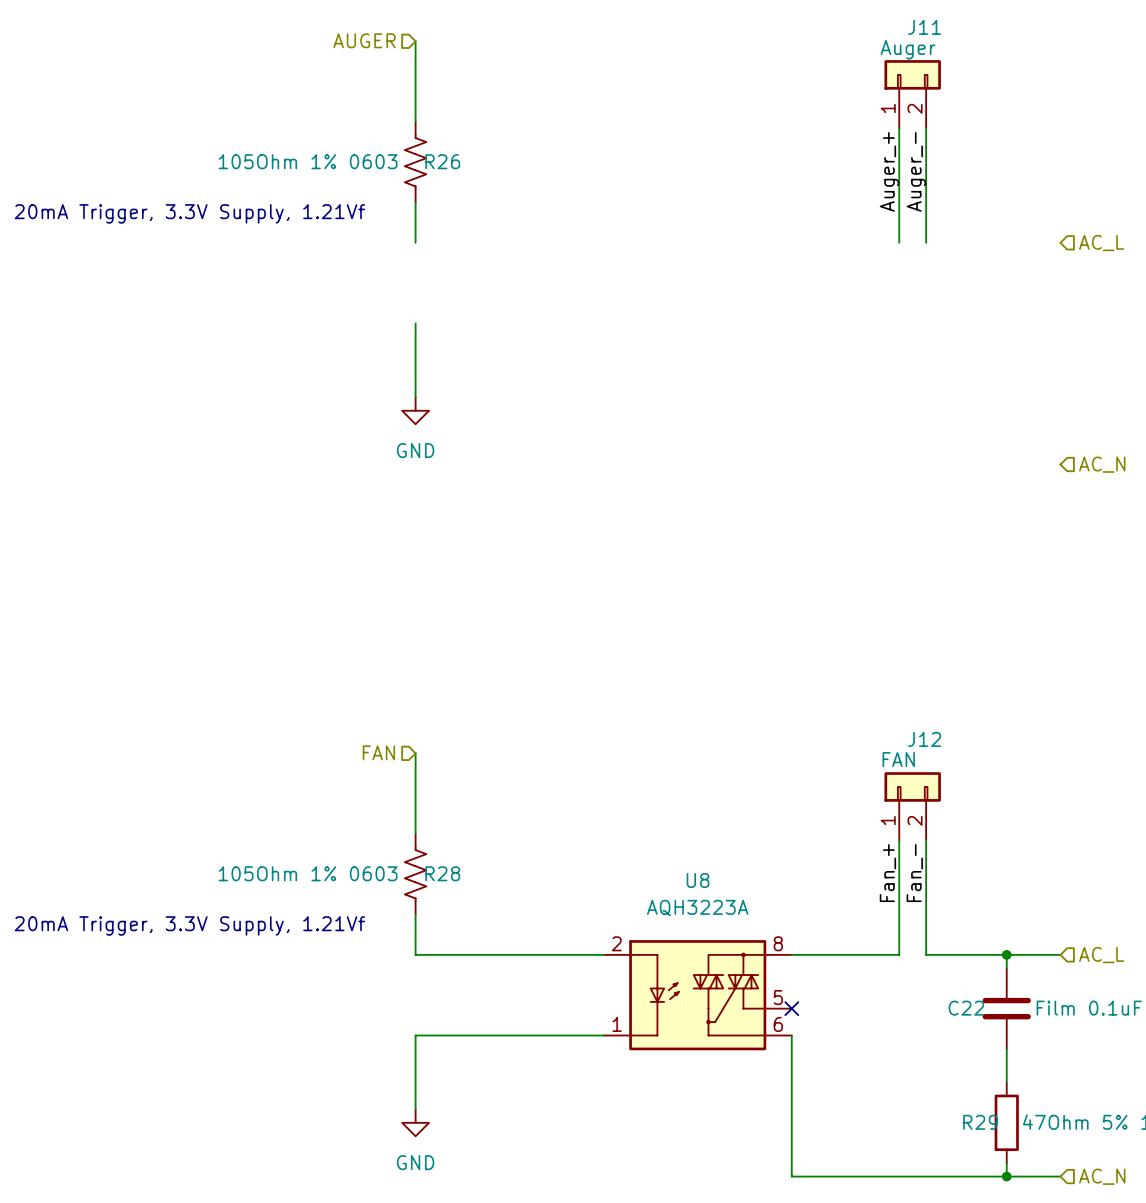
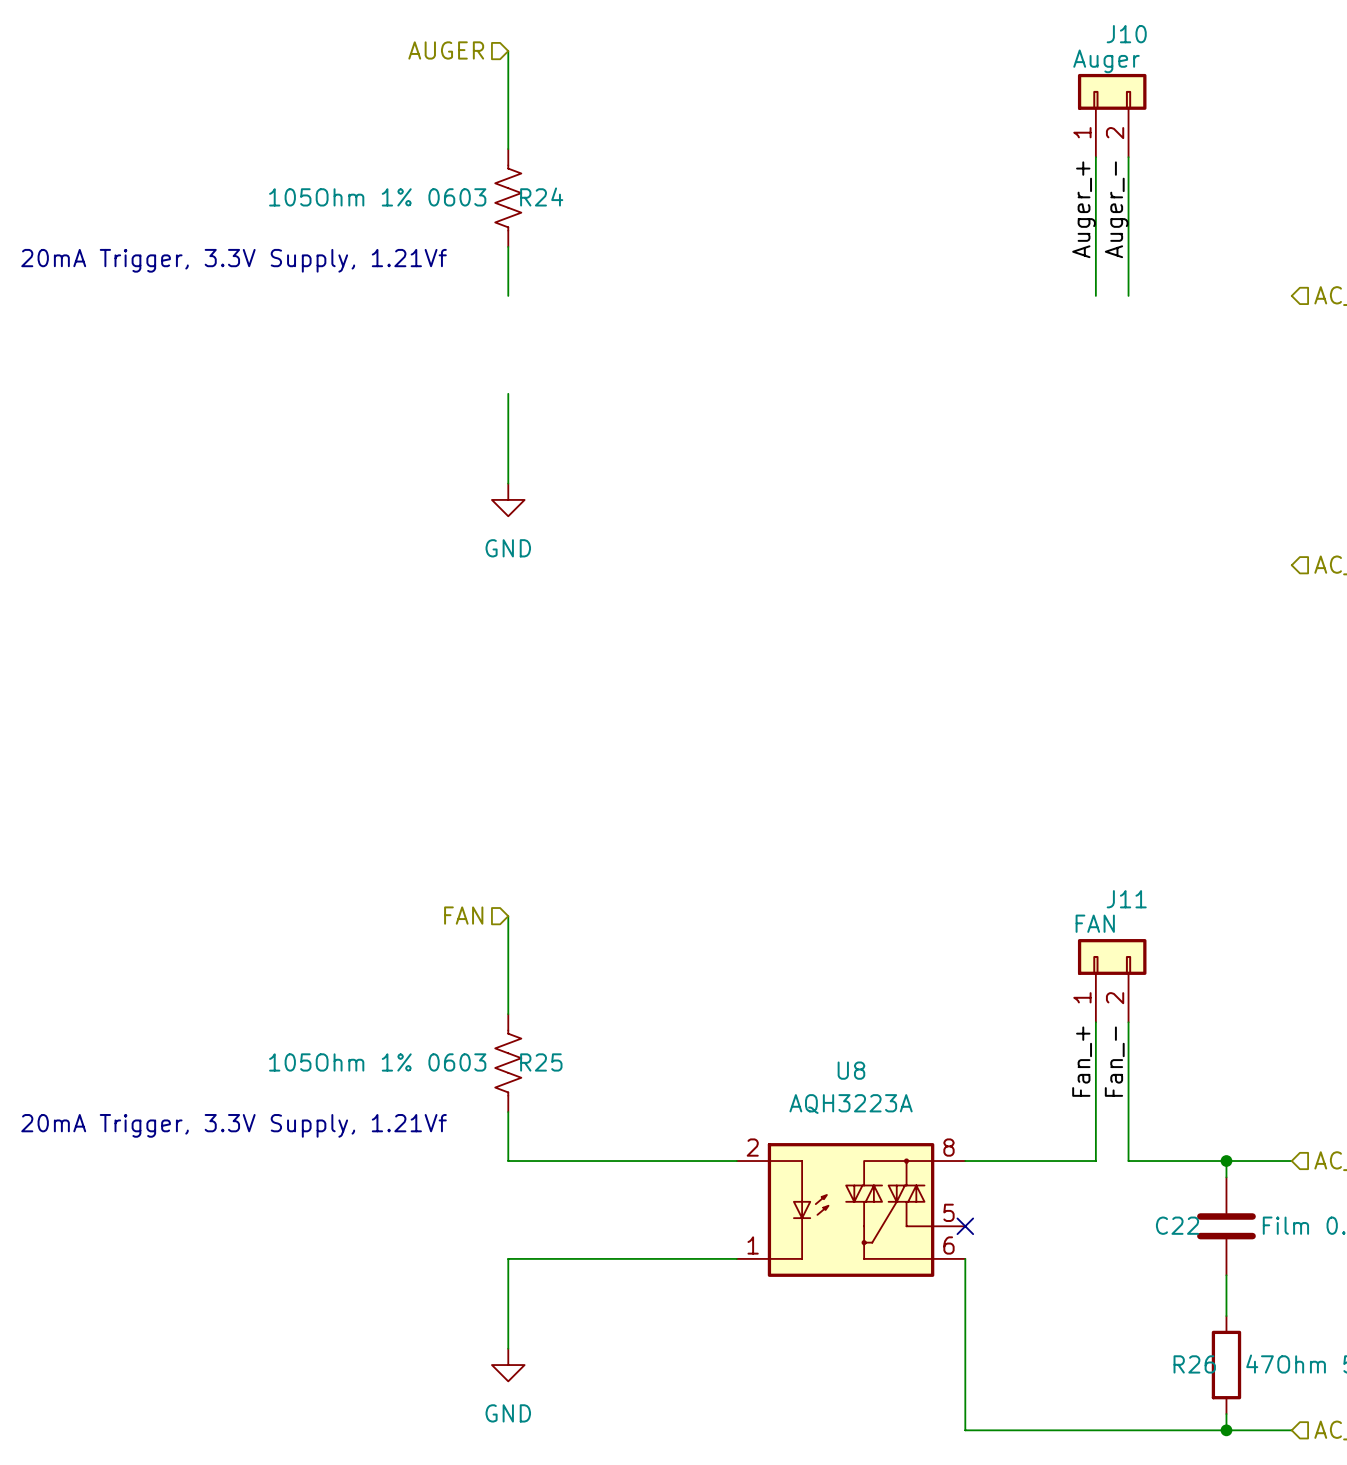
J11 name: J11 (924, 27) -> J10 (1126, 34)
R26 name: R26 (442, 161) -> R24 (541, 196)
J12 name: J12 (924, 739) -> J11 (1126, 899)
R28 name: R28 (442, 873) -> R25 (541, 1062)
R29 name: R29 (980, 1122) -> R26 (1194, 1364)

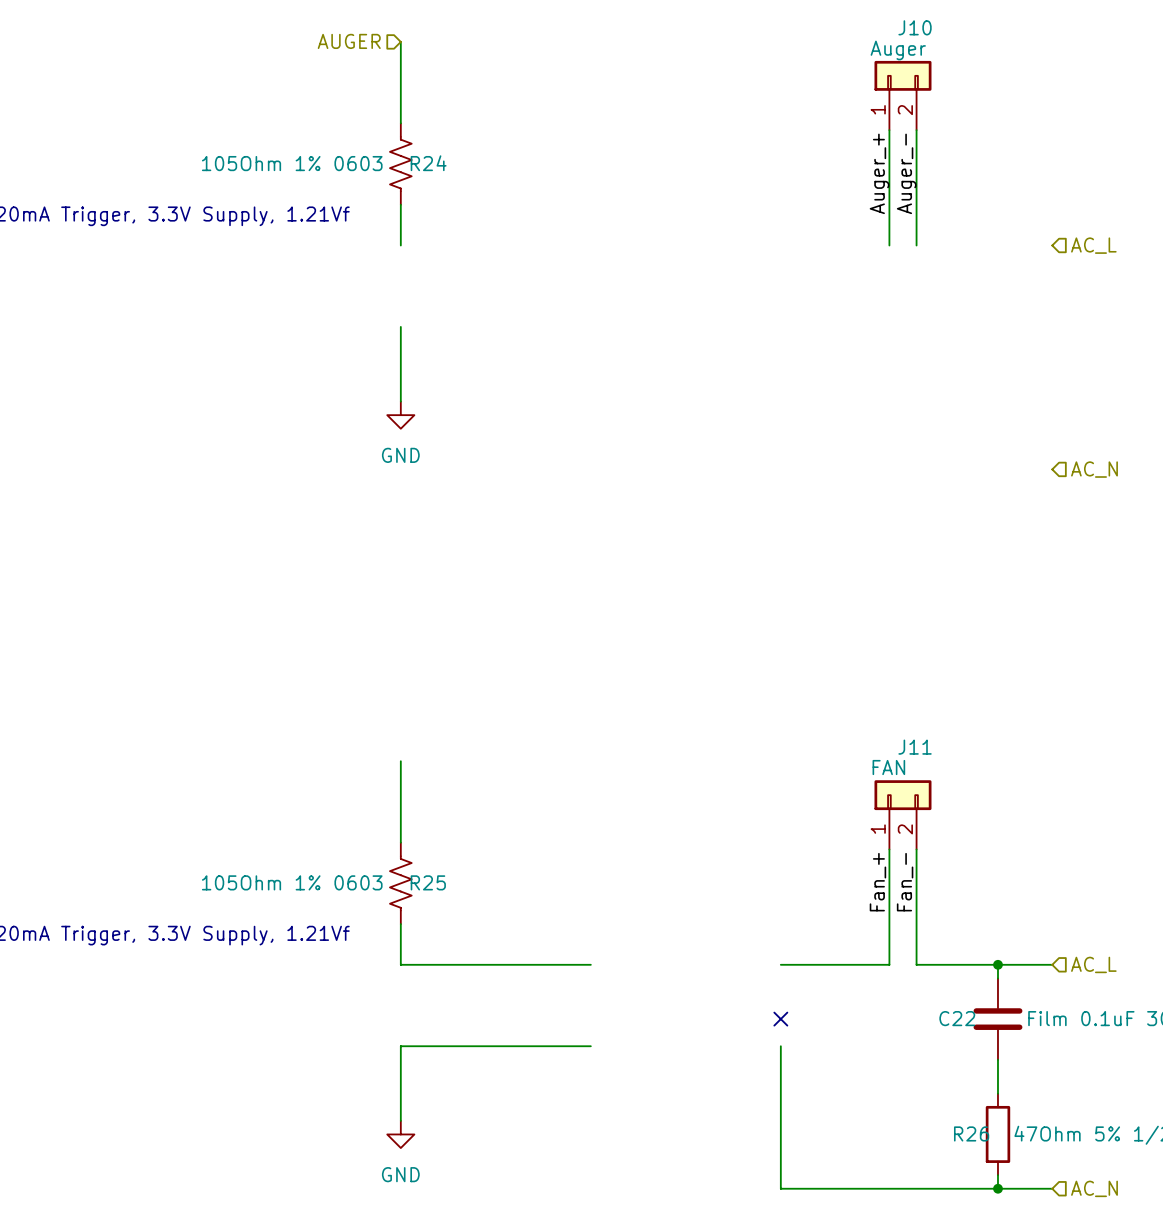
hierarchical label: FAN (463, 915) -> none
U8: AQH3223A (851, 1209) -> none

